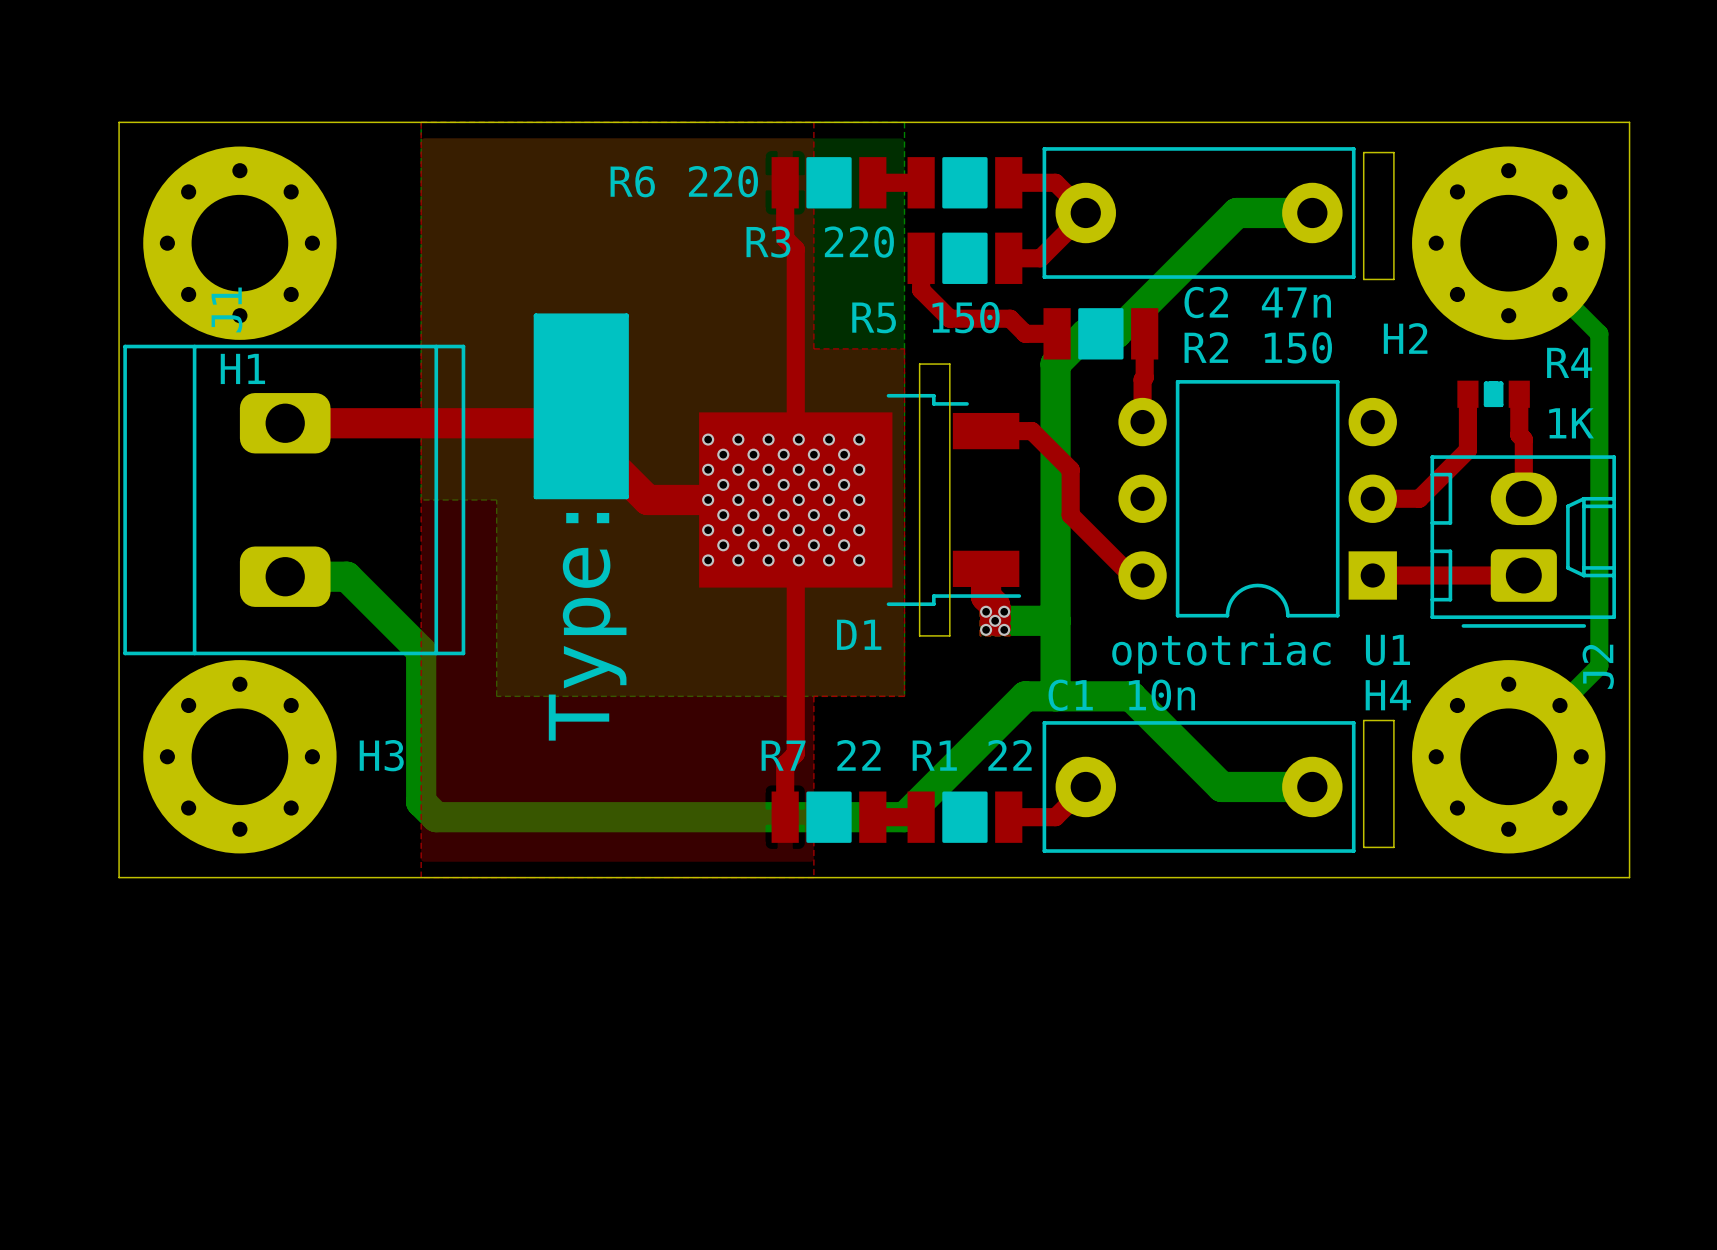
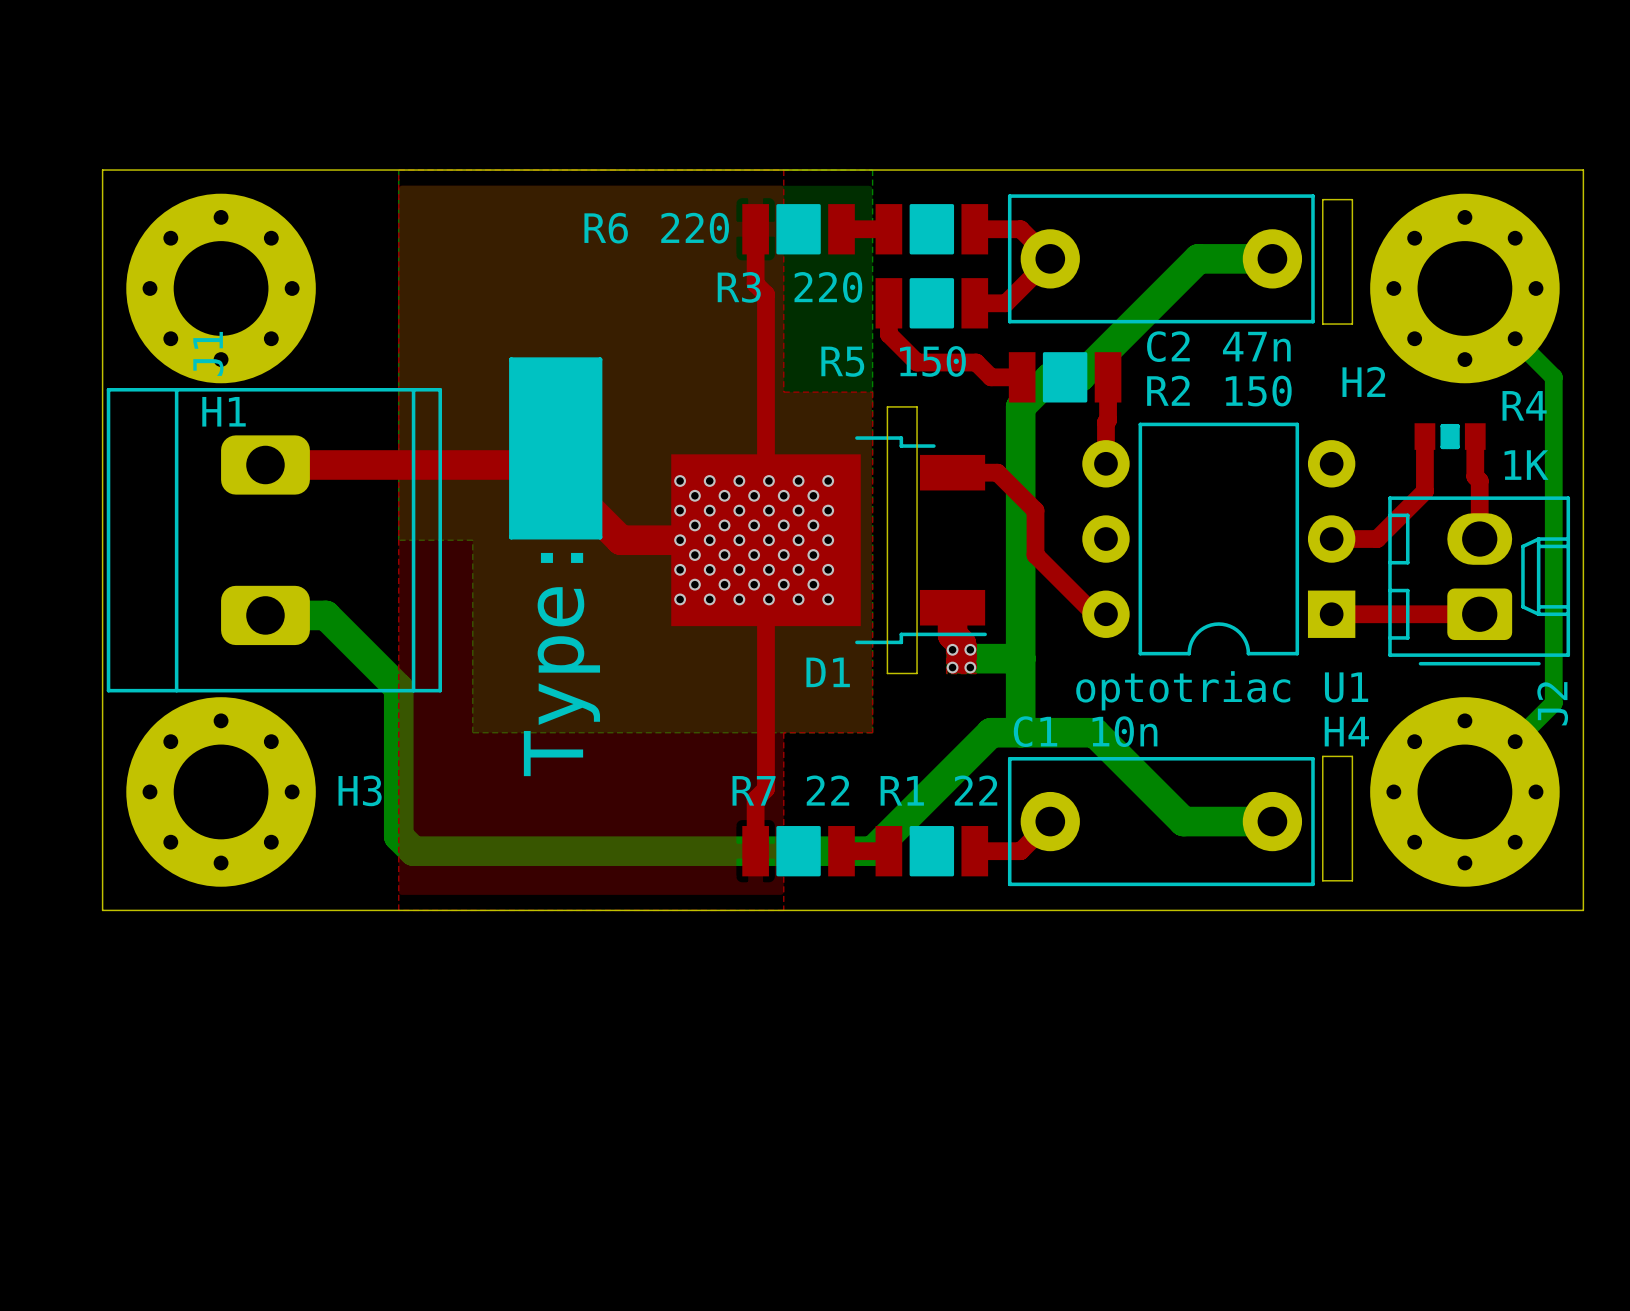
via: (995, 620) -> none

